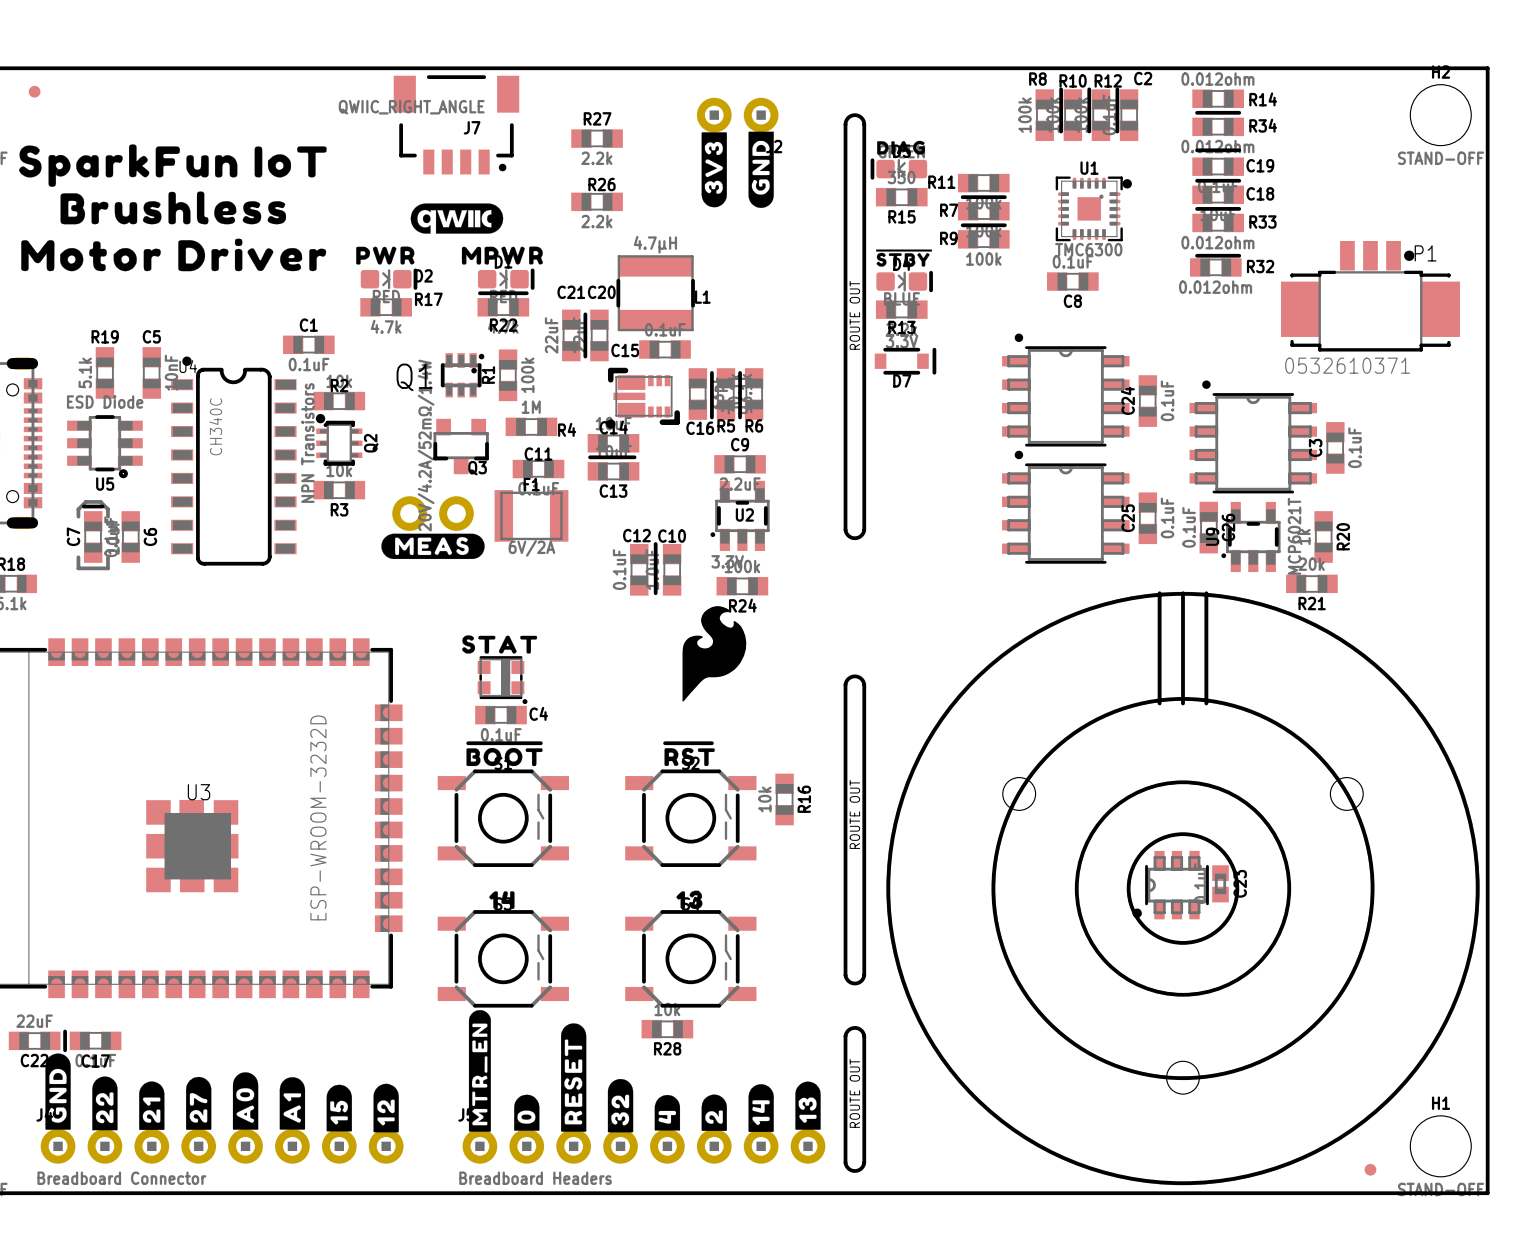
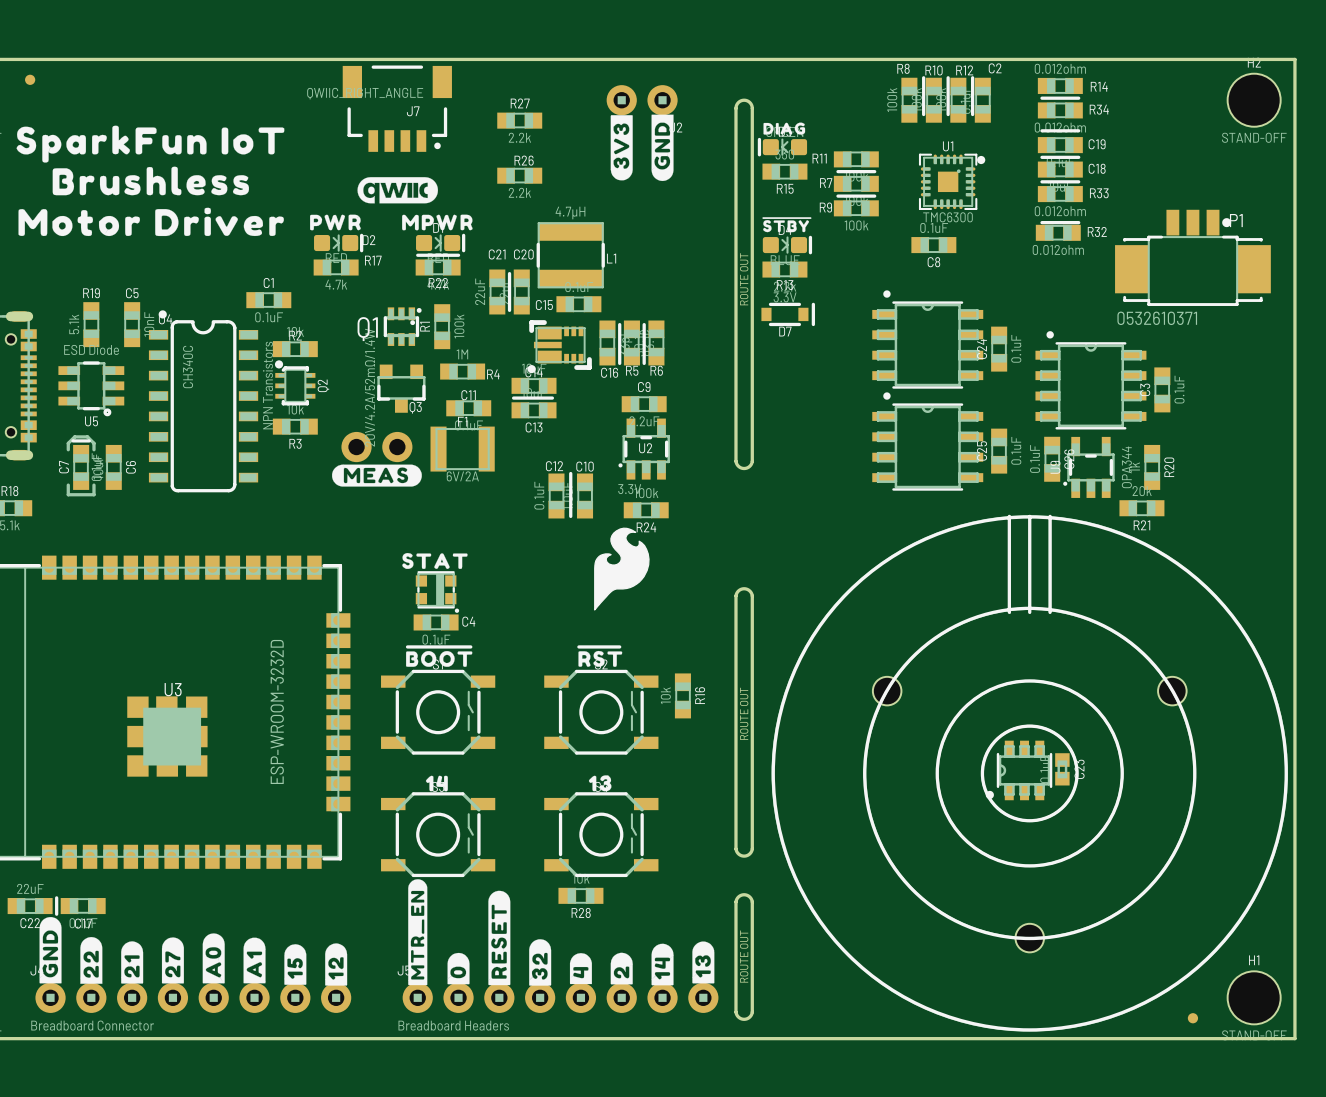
U9 value: MCP6021T (1294, 536) -> OPA344 (1126, 467)

